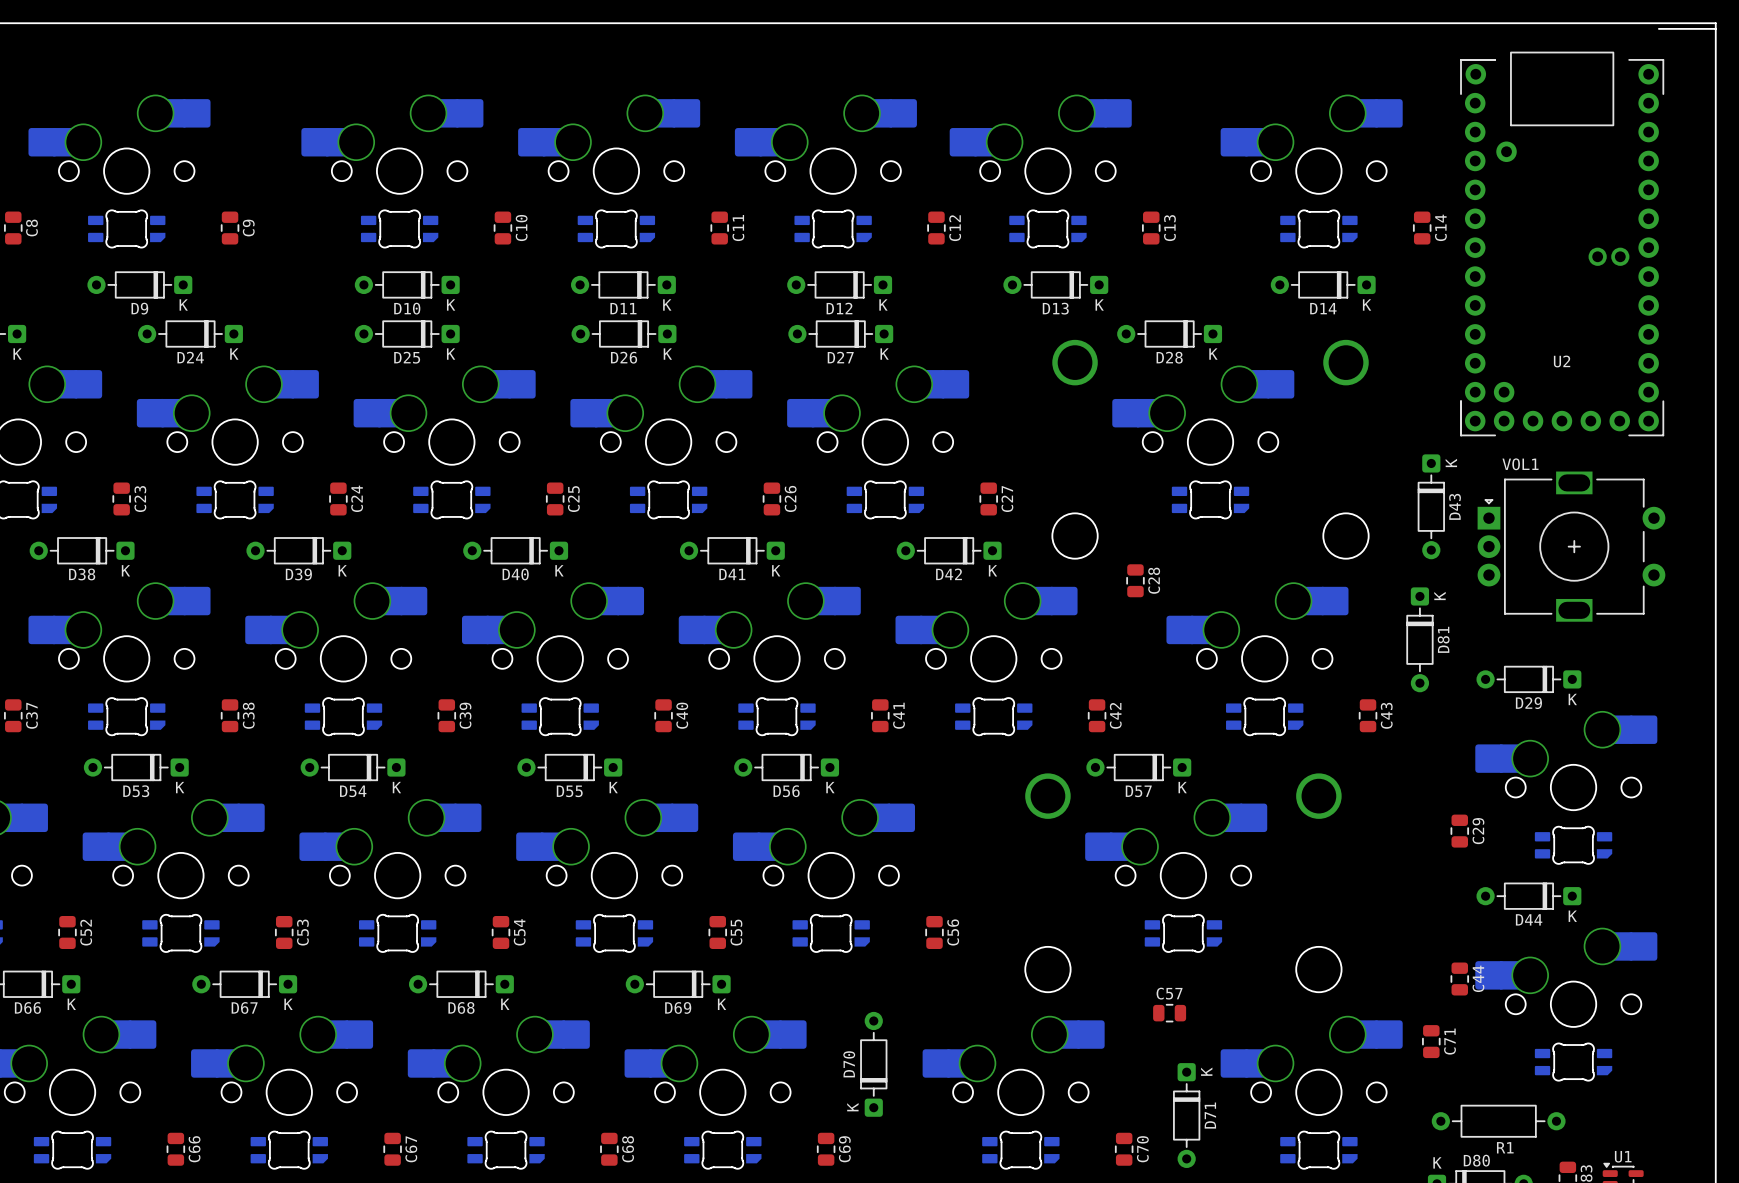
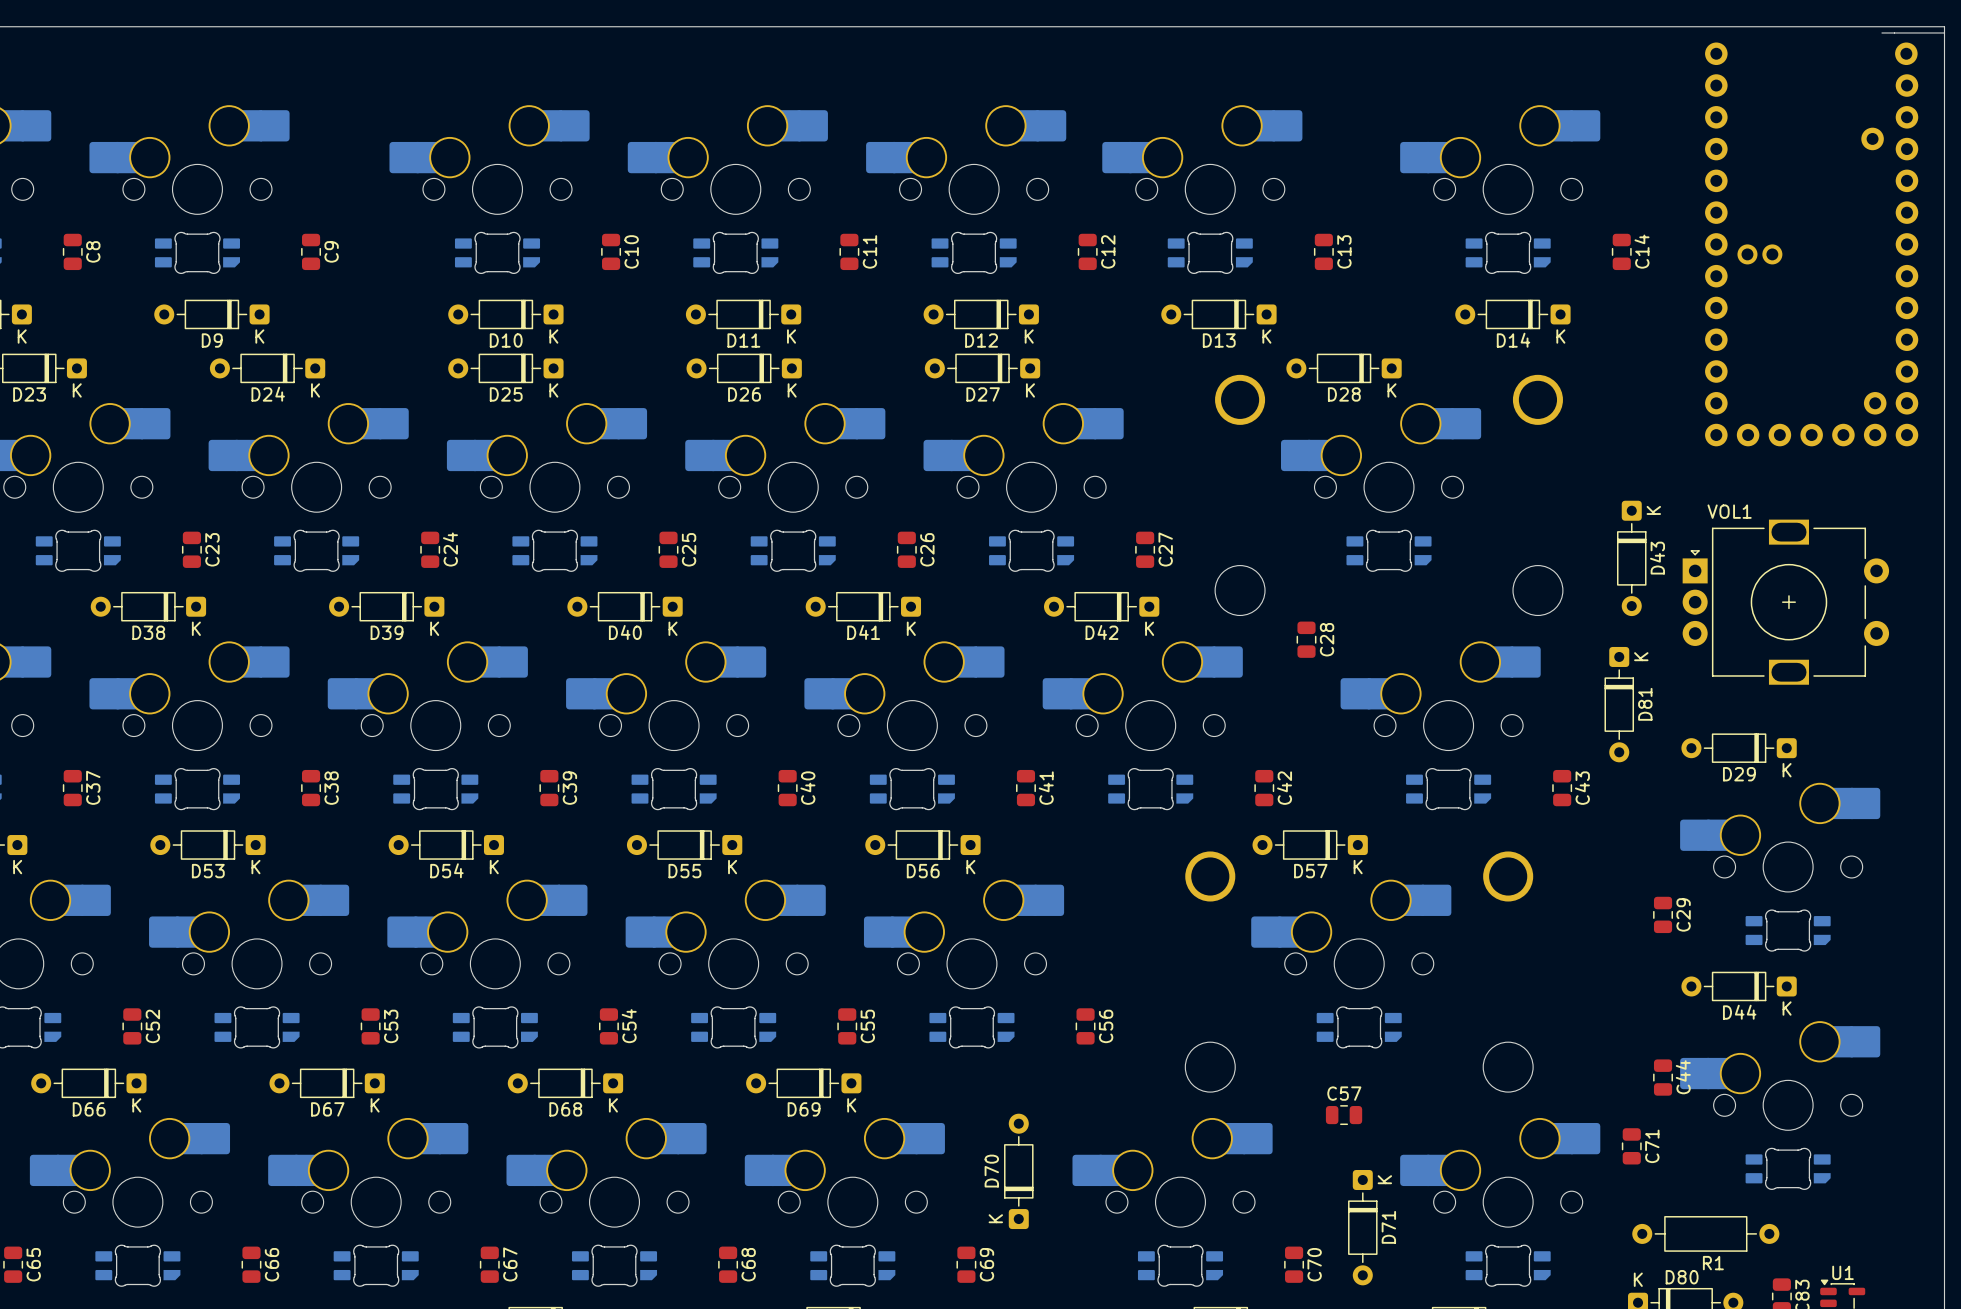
U2 side: top (1562, 243) -> bottom (1811, 244)

